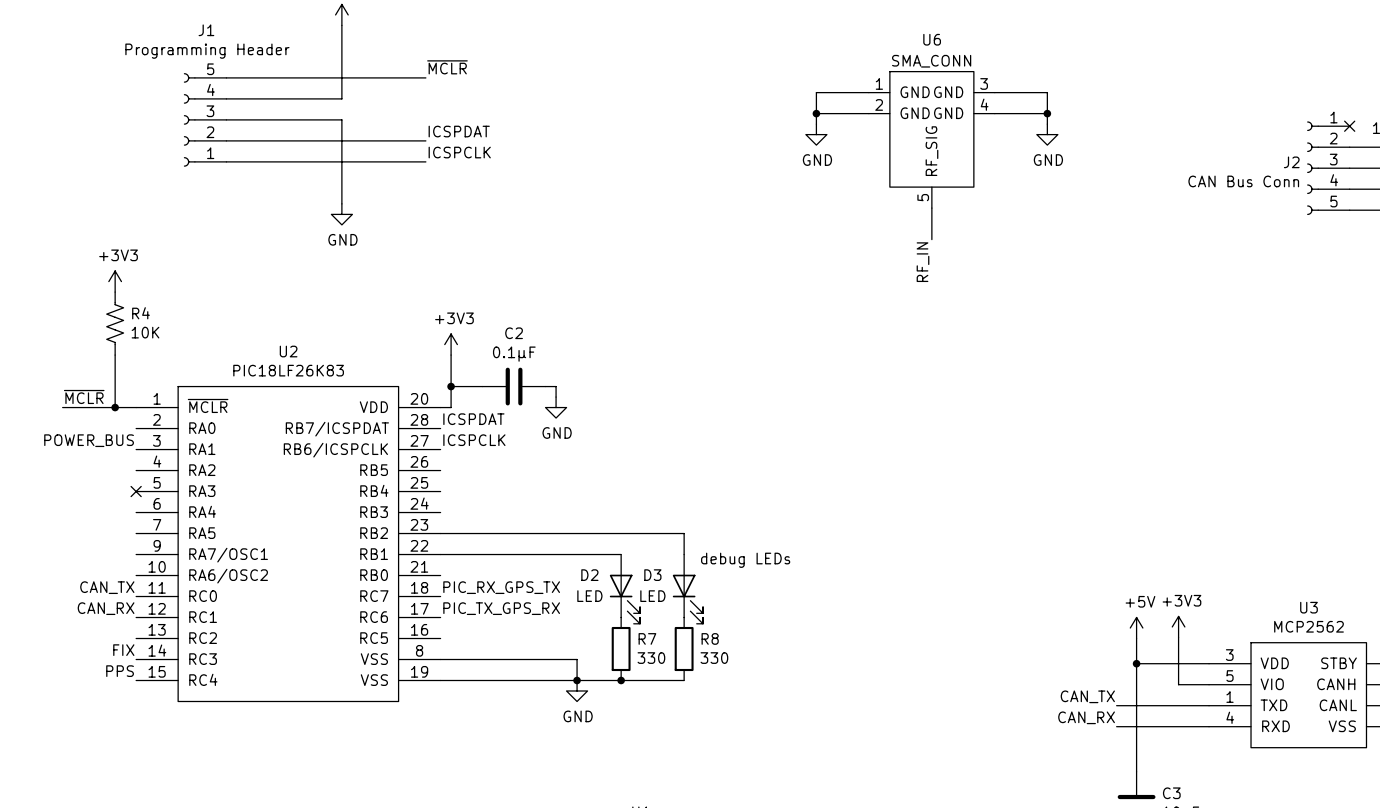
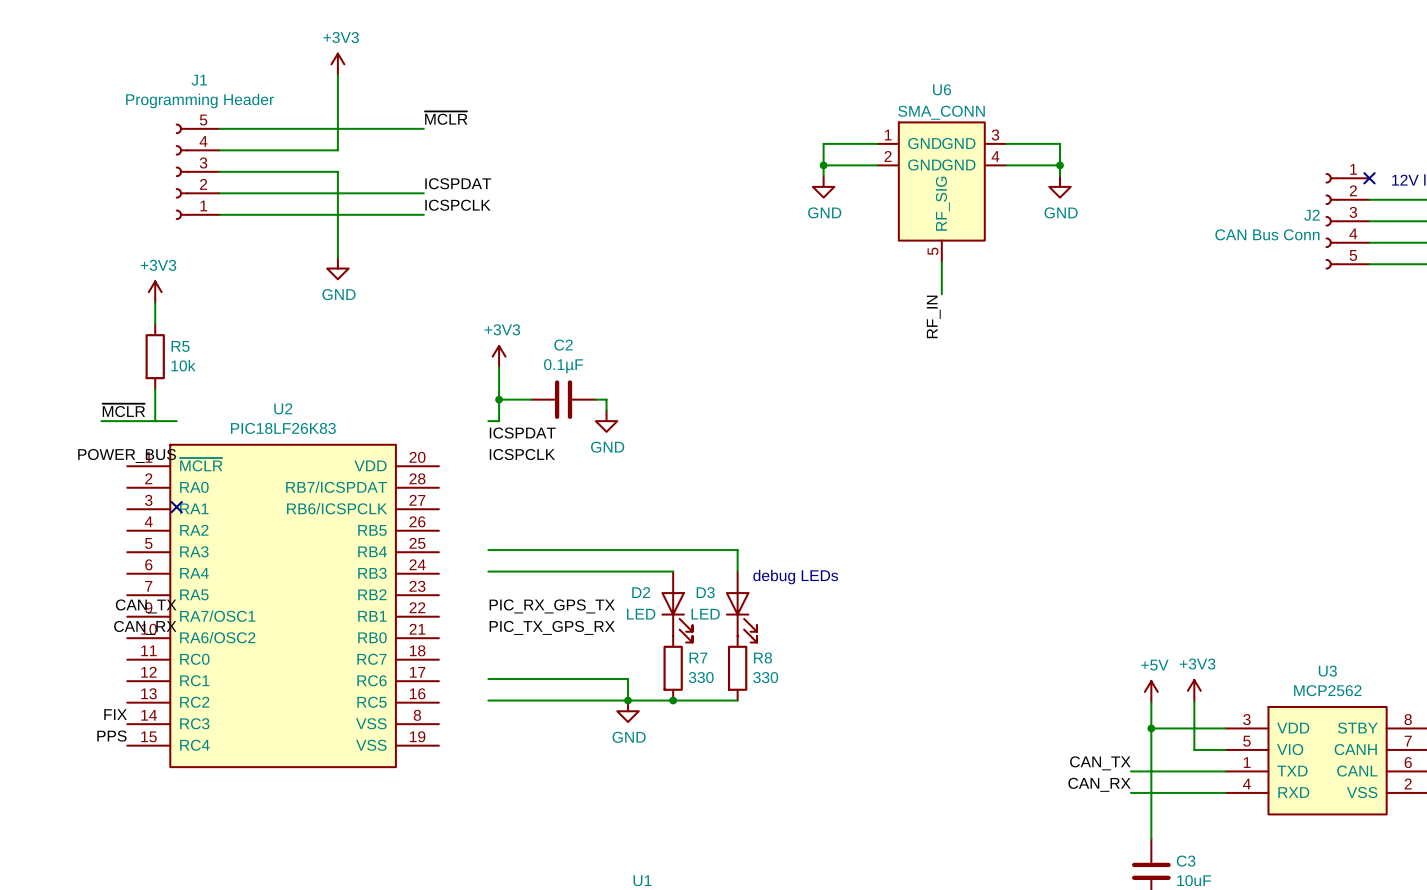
wire: none -> (155, 302) (155, 324)
power symbol position: +3V3 (115, 281) -> +3V3 (155, 292)
R5: none -> 10k (155, 356)
R4: 10K (115, 323) -> none
wire: none -> (155, 388) (155, 421)
junction: none -> (499, 399)
power symbol position: +3V3 (451, 344) -> +3V3 (499, 356)
wire: (115, 355) (115, 407) -> none
wire: (451, 355) (451, 407) (440, 407) -> (499, 367) (499, 421) (488, 421)
wire: (451, 386) (482, 386) -> (499, 399) (531, 399)
junction: (451, 386) -> none
C2 position: (514, 386) -> (563, 399)
wire: (545, 386) (556, 386) (556, 397) -> (595, 399) (606, 399) (606, 410)
label position: ~{MCLR} (84, 396) -> ~{MCLR} (123, 410)
wire: (62, 407) (136, 407) -> (101, 421) (176, 421)
junction: (115, 407) -> none
power symbol position: GND (556, 407) -> GND (606, 421)
label position: ICSPDAT (473, 419) -> ICSPDAT (522, 433)
label position: POWER_BUS (89, 440) -> POWER_BUS (127, 456)
label position: ICSPCLK (474, 440) -> ICSPCLK (522, 454)
no-connect mark: none -> (176, 507)
no-connect mark: (136, 491) -> none
wire: (440, 533) (684, 533) (684, 554) -> (488, 550) (737, 550) (737, 571)
wire: (440, 554) (621, 554) -> (488, 571) (673, 571)
text position: debug LEDs (745, 560) -> debug LEDs (795, 577)
label position: CAN_TX (107, 587) -> CAN_TX (146, 606)
label position: PIC_RX_GPS_TX (501, 587) -> PIC_RX_GPS_TX (552, 606)
D2 position: (624, 589) -> (677, 607)
D3 position: (687, 589) -> (741, 607)
label position: CAN_RX (106, 608) -> CAN_RX (145, 627)
label position: PIC_TX_GPS_RX (501, 608) -> PIC_TX_GPS_RX (552, 627)
junction: none -> (628, 700)
junction: none -> (673, 700)
R7 position: (621, 649) -> (673, 668)
R8 position: (684, 649) -> (737, 668)
wire: (440, 659) (577, 659) (577, 680) -> (488, 679) (628, 679) (628, 700)
wire: (440, 680) (684, 680) -> (488, 700) (737, 700)
junction: (577, 680) -> none
junction: (621, 680) -> none
power symbol position: GND (577, 690) -> GND (628, 711)

